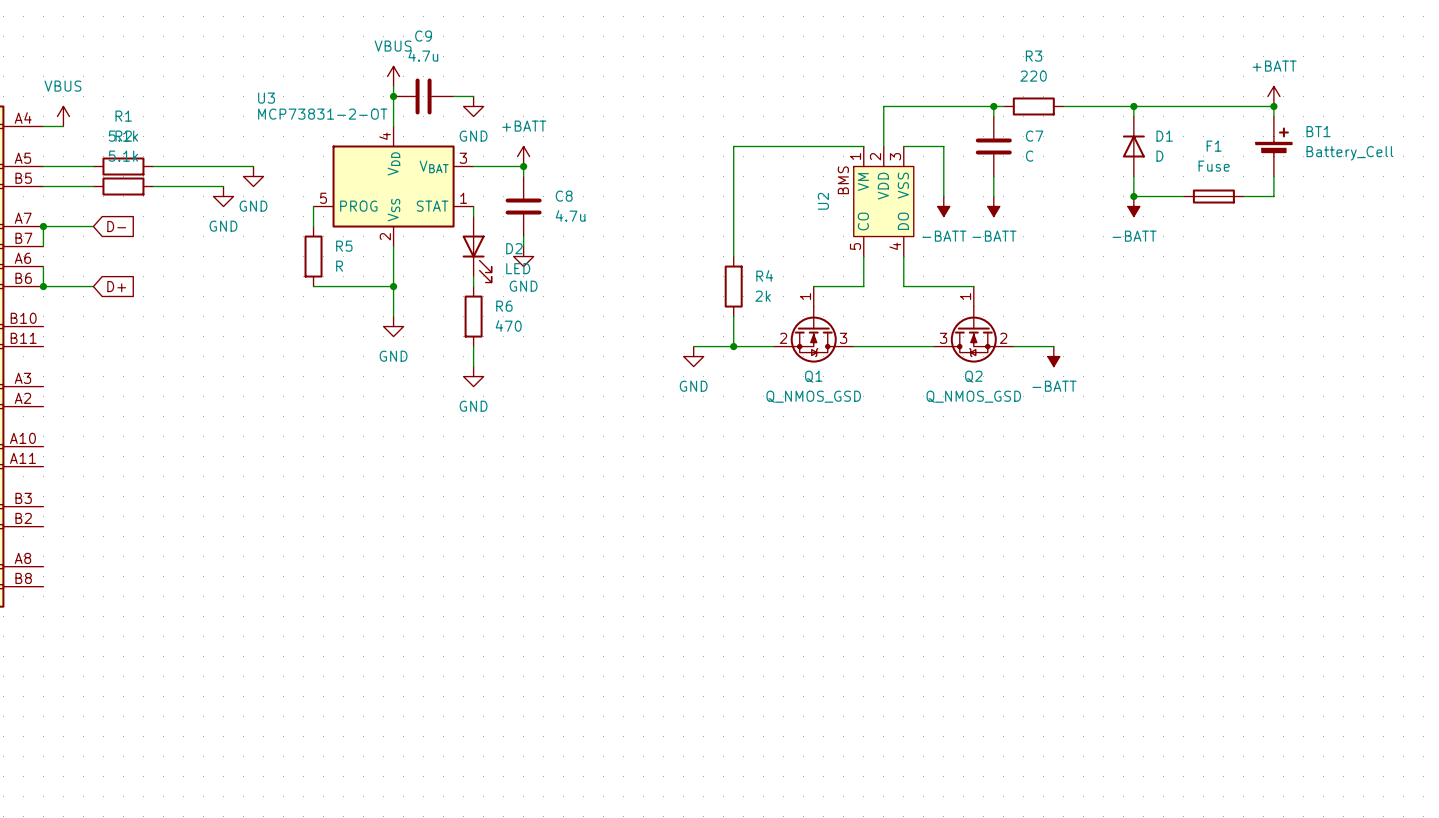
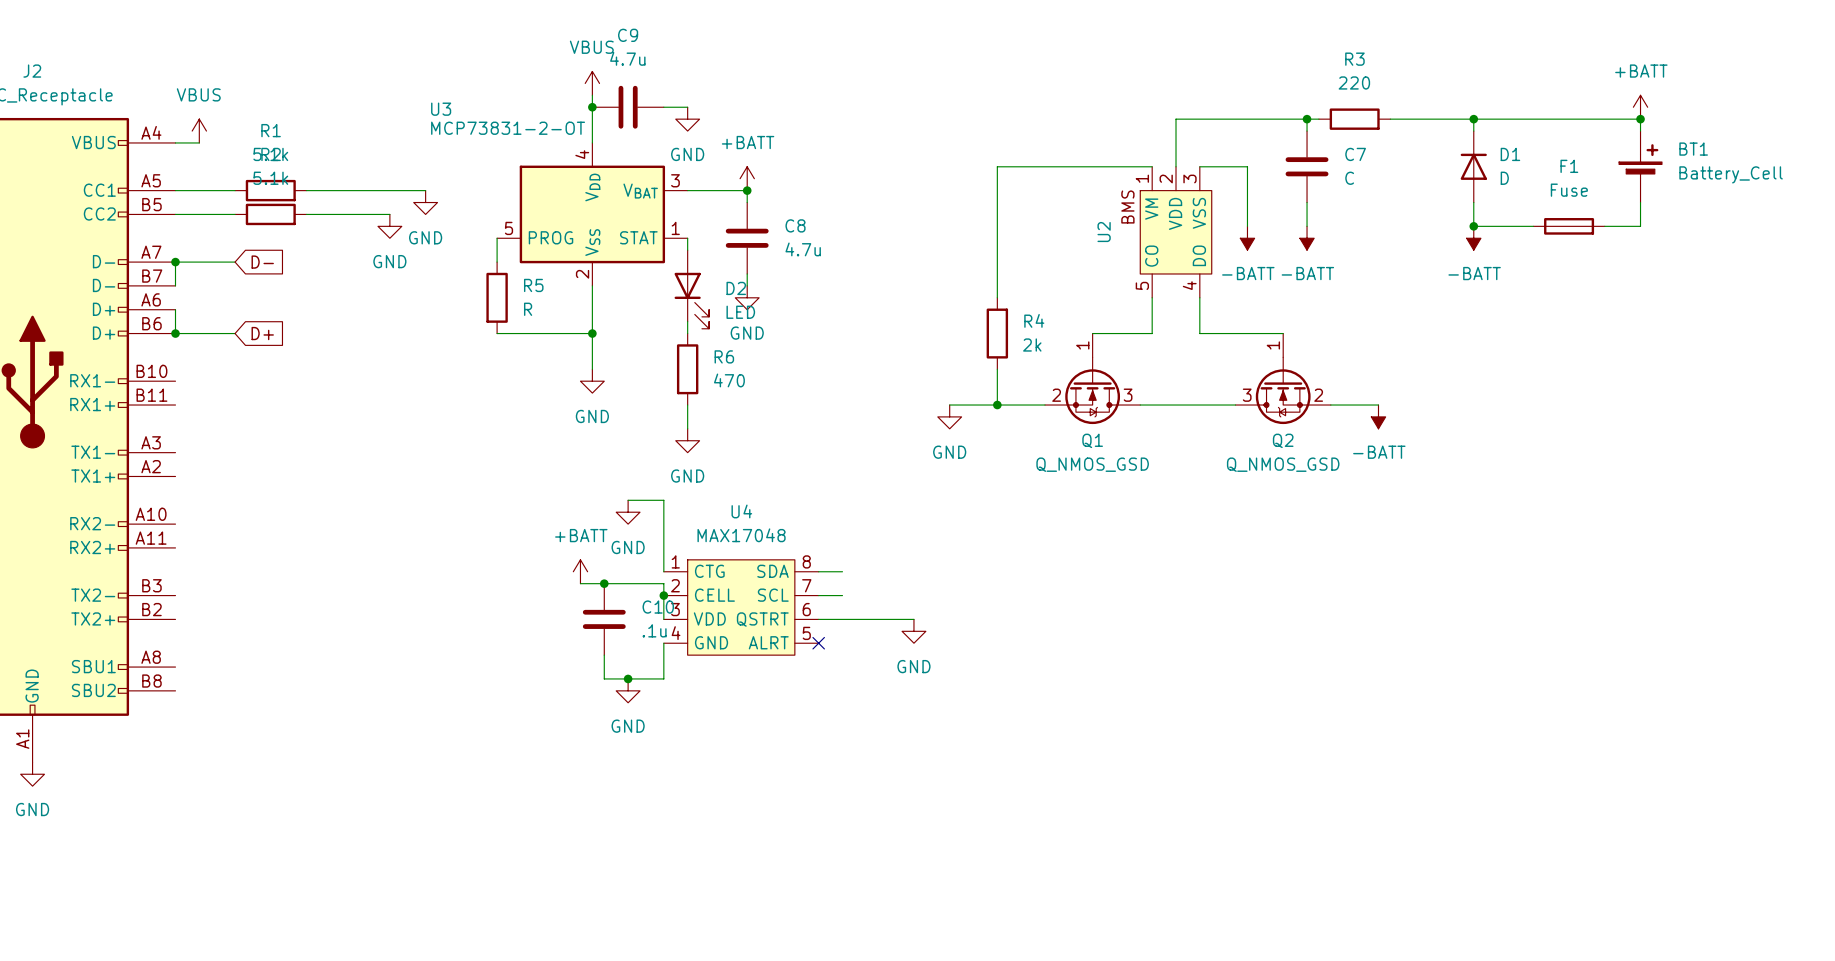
wire: none -> (628, 500) (663, 500) (663, 571)
power symbol: none -> GND (628, 512)
power symbol: none -> +BATT (580, 571)
wire: none -> (818, 571) (842, 571)
wire: none -> (580, 583) (663, 583) (663, 619)
junction: none -> (604, 583)
junction: none -> (663, 595)
wire: none -> (818, 595) (842, 595)
U4: none -> MAX17048 (741, 607)
C10: none -> .1u (604, 619)
wire: none -> (818, 619) (913, 619)
power symbol: none -> GND (913, 631)
wire: none -> (663, 643) (663, 678) (604, 678) (604, 655)
no-connect mark: none -> (818, 643)
junction: none -> (628, 678)
power symbol: none -> GND (628, 690)

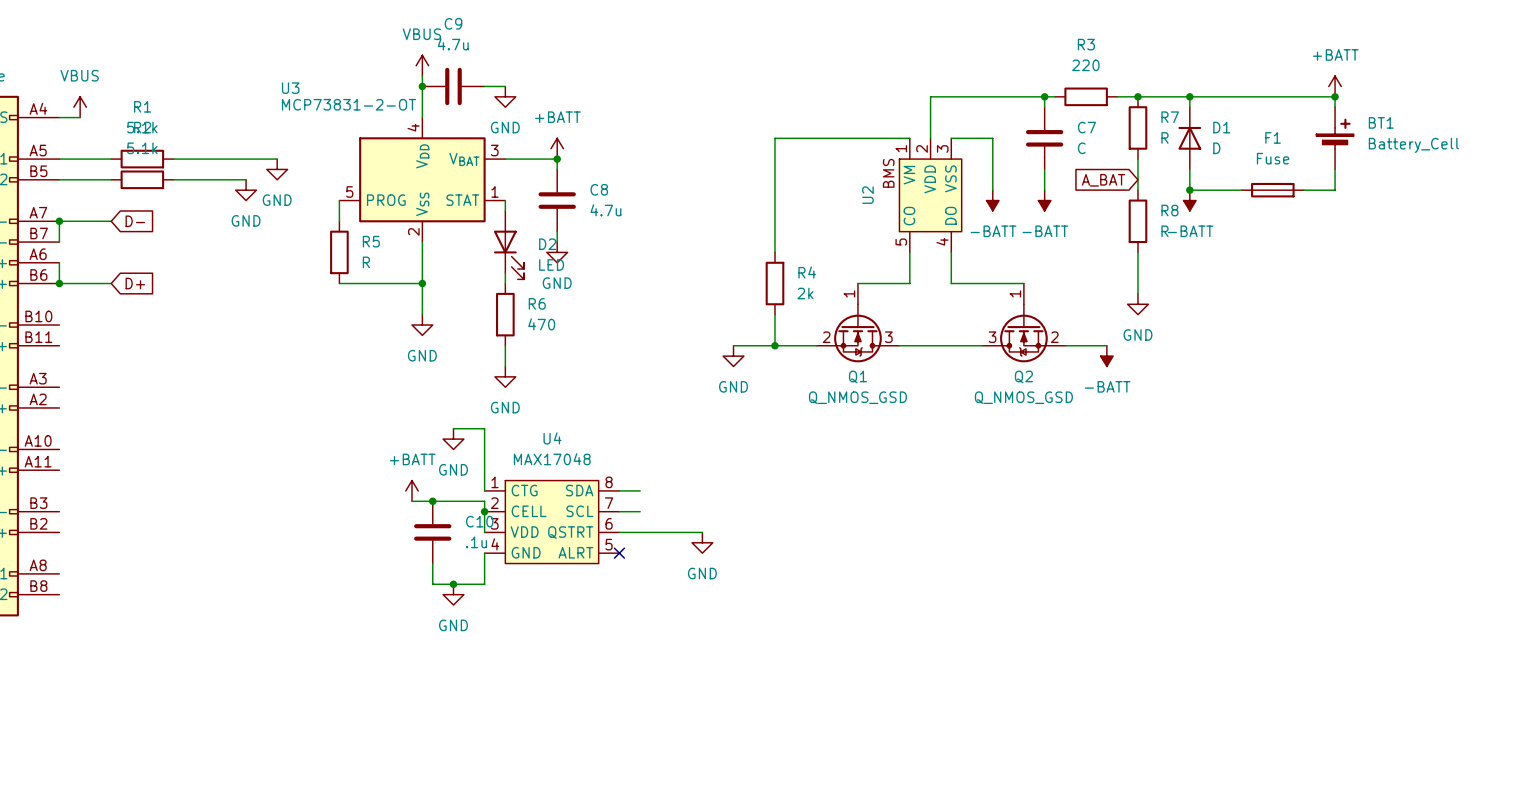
junction: none -> (1137, 96)
R7: none -> R (1137, 127)
wire: none -> (1137, 159) (1137, 190)
global label: none -> A_BAT (1103, 180)
R8: none -> R (1137, 221)
wire: none -> (1137, 252) (1137, 293)
power symbol: none -> GND (1137, 304)

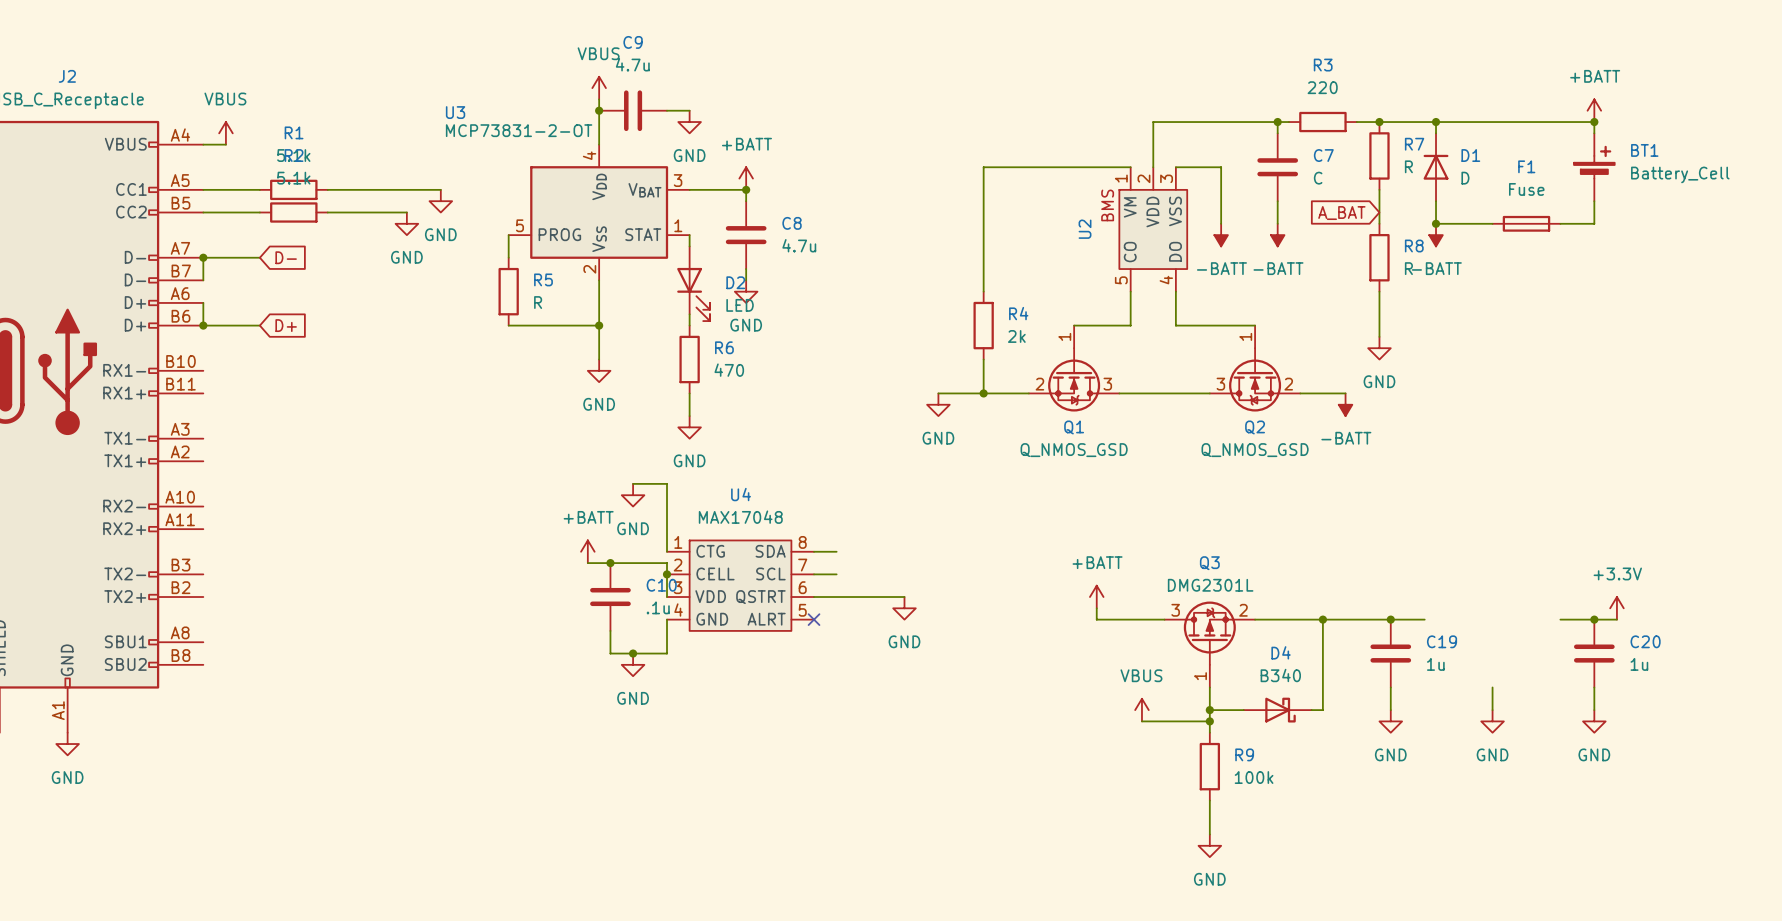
power symbol: none -> +BATT (1096, 597)
wire: none -> (1096, 608) (1096, 619) (1164, 619)
power symbol: none -> +3.3V (1616, 608)
wire: none -> (1255, 619) (1424, 619)
wire: none -> (1322, 619) (1322, 710) (1311, 710)
junction: none -> (1322, 619)
junction: none -> (1390, 619)
wire: none -> (1560, 619) (1616, 619)
junction: none -> (1594, 619)
Q3: none -> DMG2301L (1209, 644)
C19: none -> 1u (1390, 653)
C20: none -> 1u (1594, 653)
wire: none -> (1209, 687) (1209, 732)
wire: none -> (1390, 687) (1390, 710)
wire: none -> (1492, 687) (1492, 710)
wire: none -> (1594, 687) (1594, 710)
power symbol: none -> VBUS (1141, 710)
wire: none -> (1209, 710) (1243, 710)
junction: none -> (1209, 710)
D4: none -> B340 (1277, 710)
wire: none -> (1141, 721) (1209, 721)
junction: none -> (1209, 721)
power symbol: none -> GND (1390, 721)
power symbol: none -> GND (1492, 721)
power symbol: none -> GND (1594, 721)
R9: none -> 100k (1209, 766)
wire: none -> (1209, 800) (1209, 834)
power symbol: none -> GND (1209, 845)

